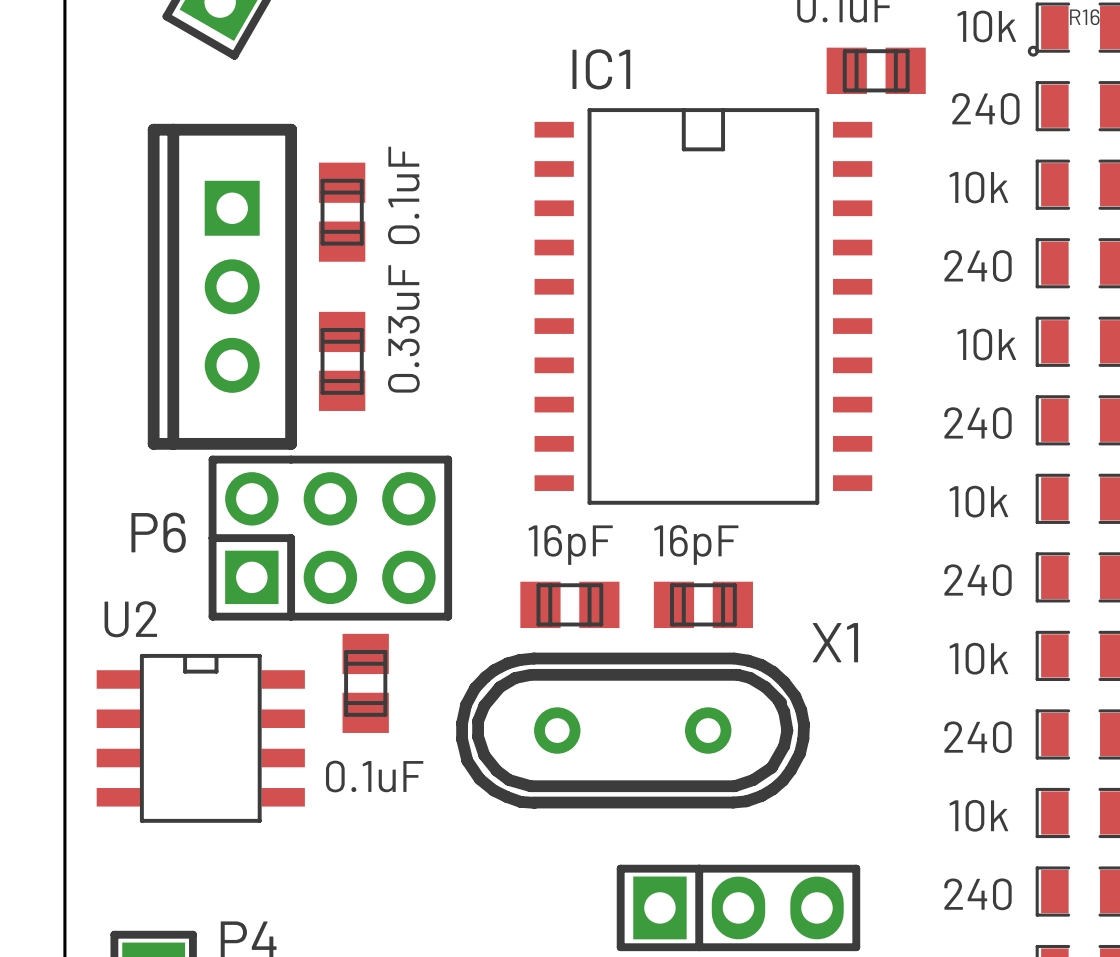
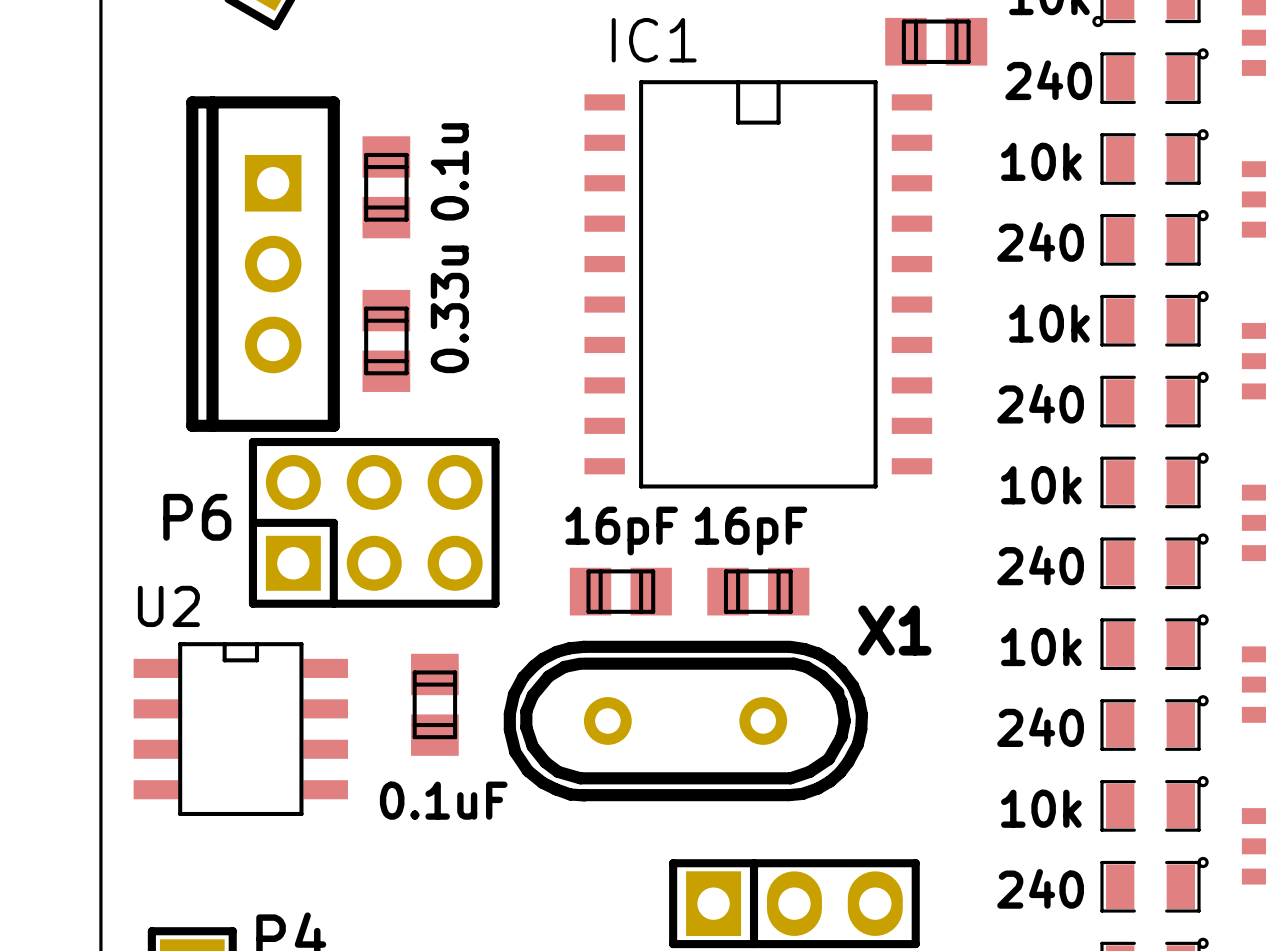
part value: 0.1uF (403, 195) -> 0.1u (449, 171)
part value: 0.33uF (403, 328) -> 0.33u (449, 309)
part position: (365, 683) -> (434, 704)

